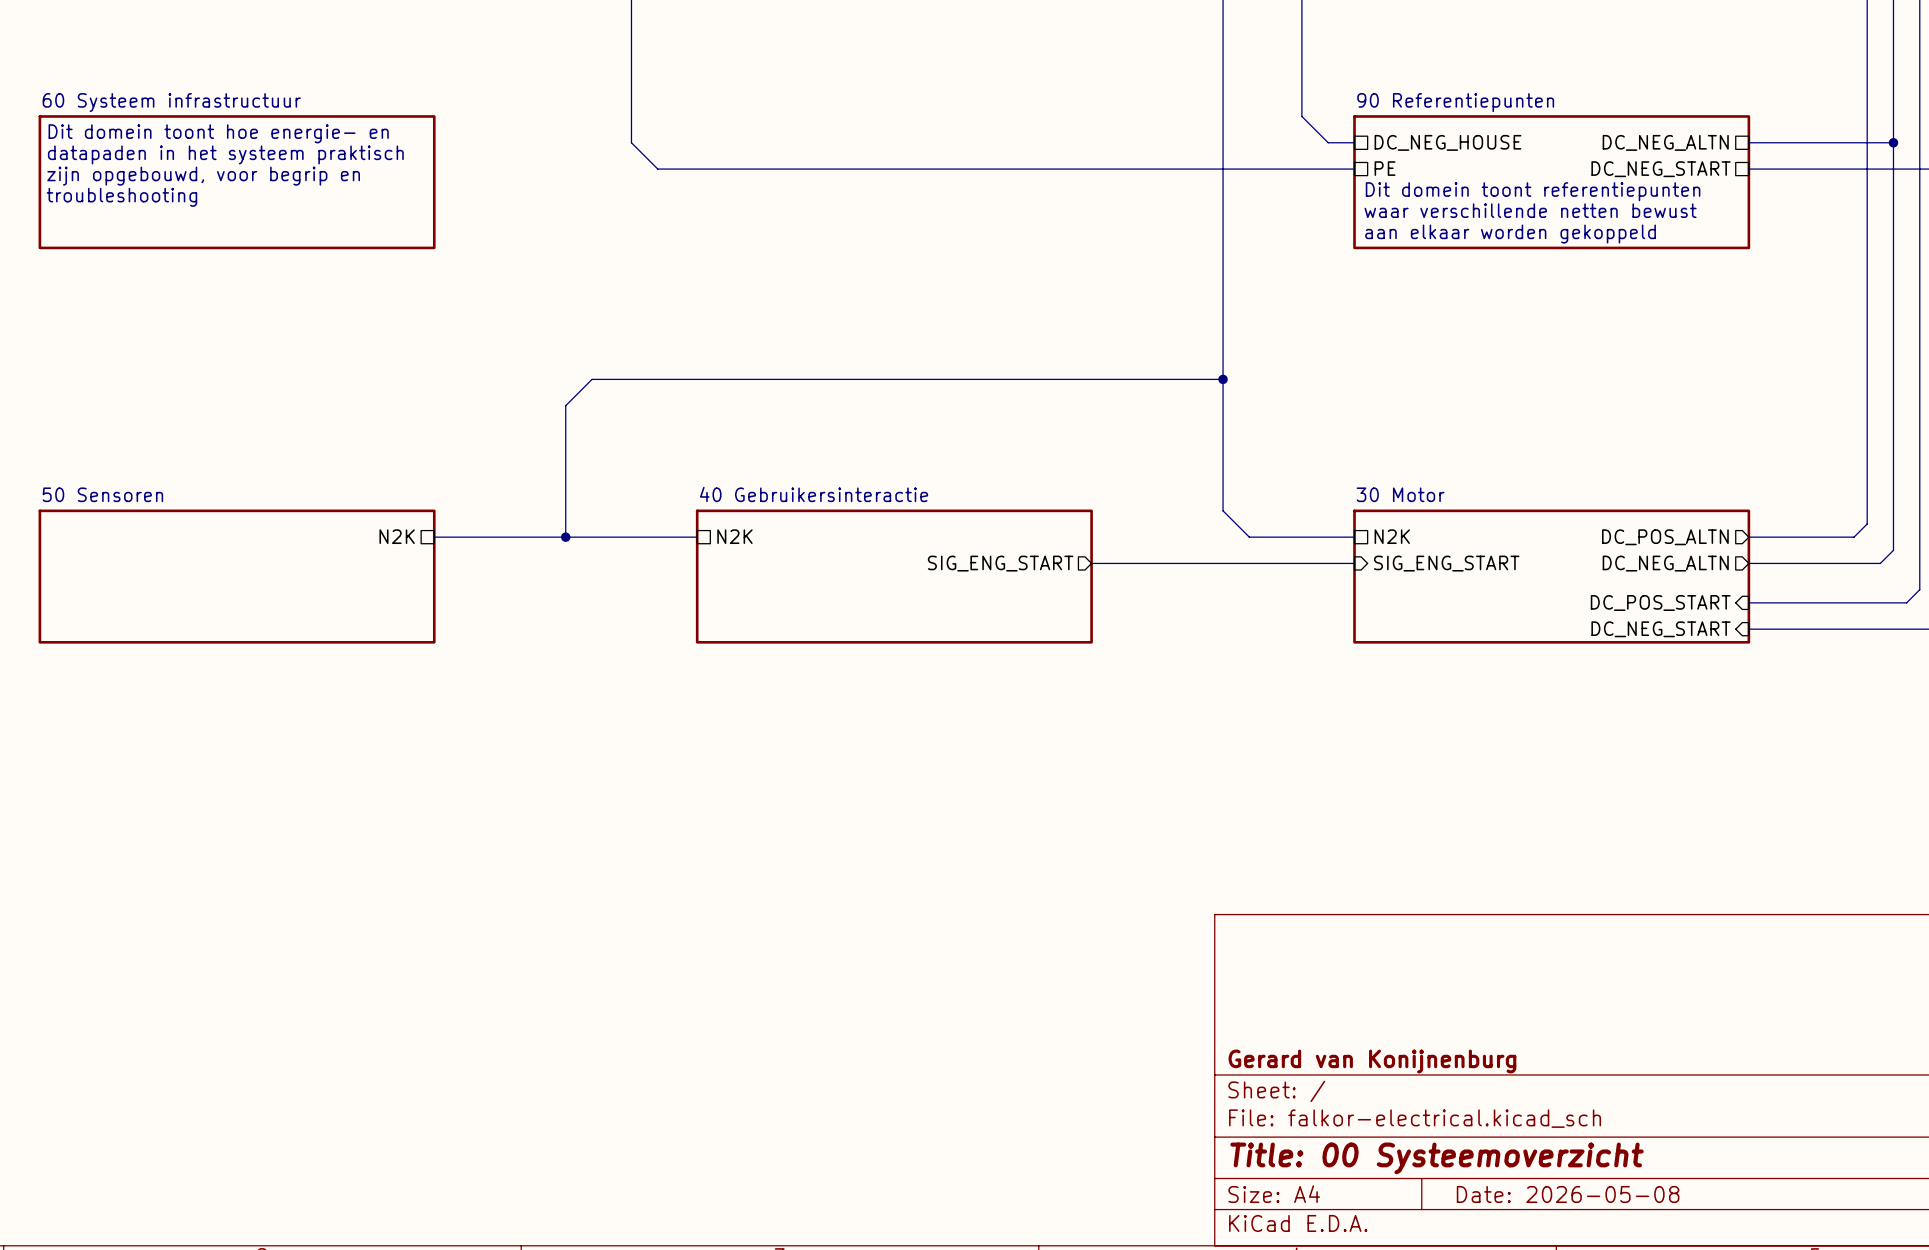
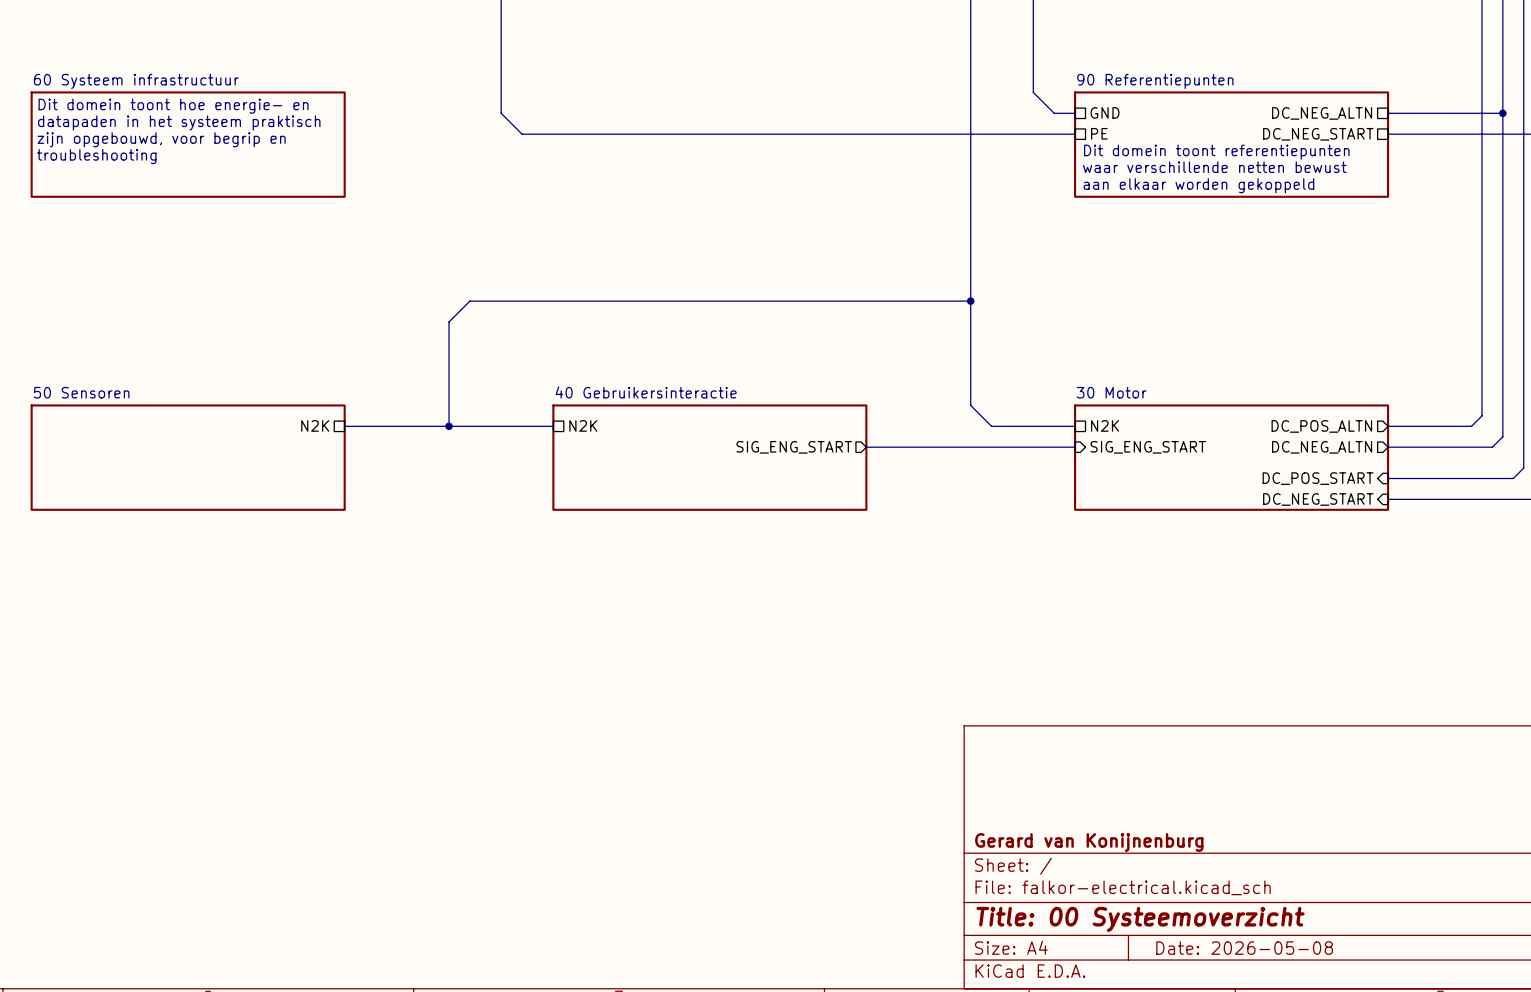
sheet pin: DC_NEG_HOUSE (1447, 142) -> GND (1105, 112)

